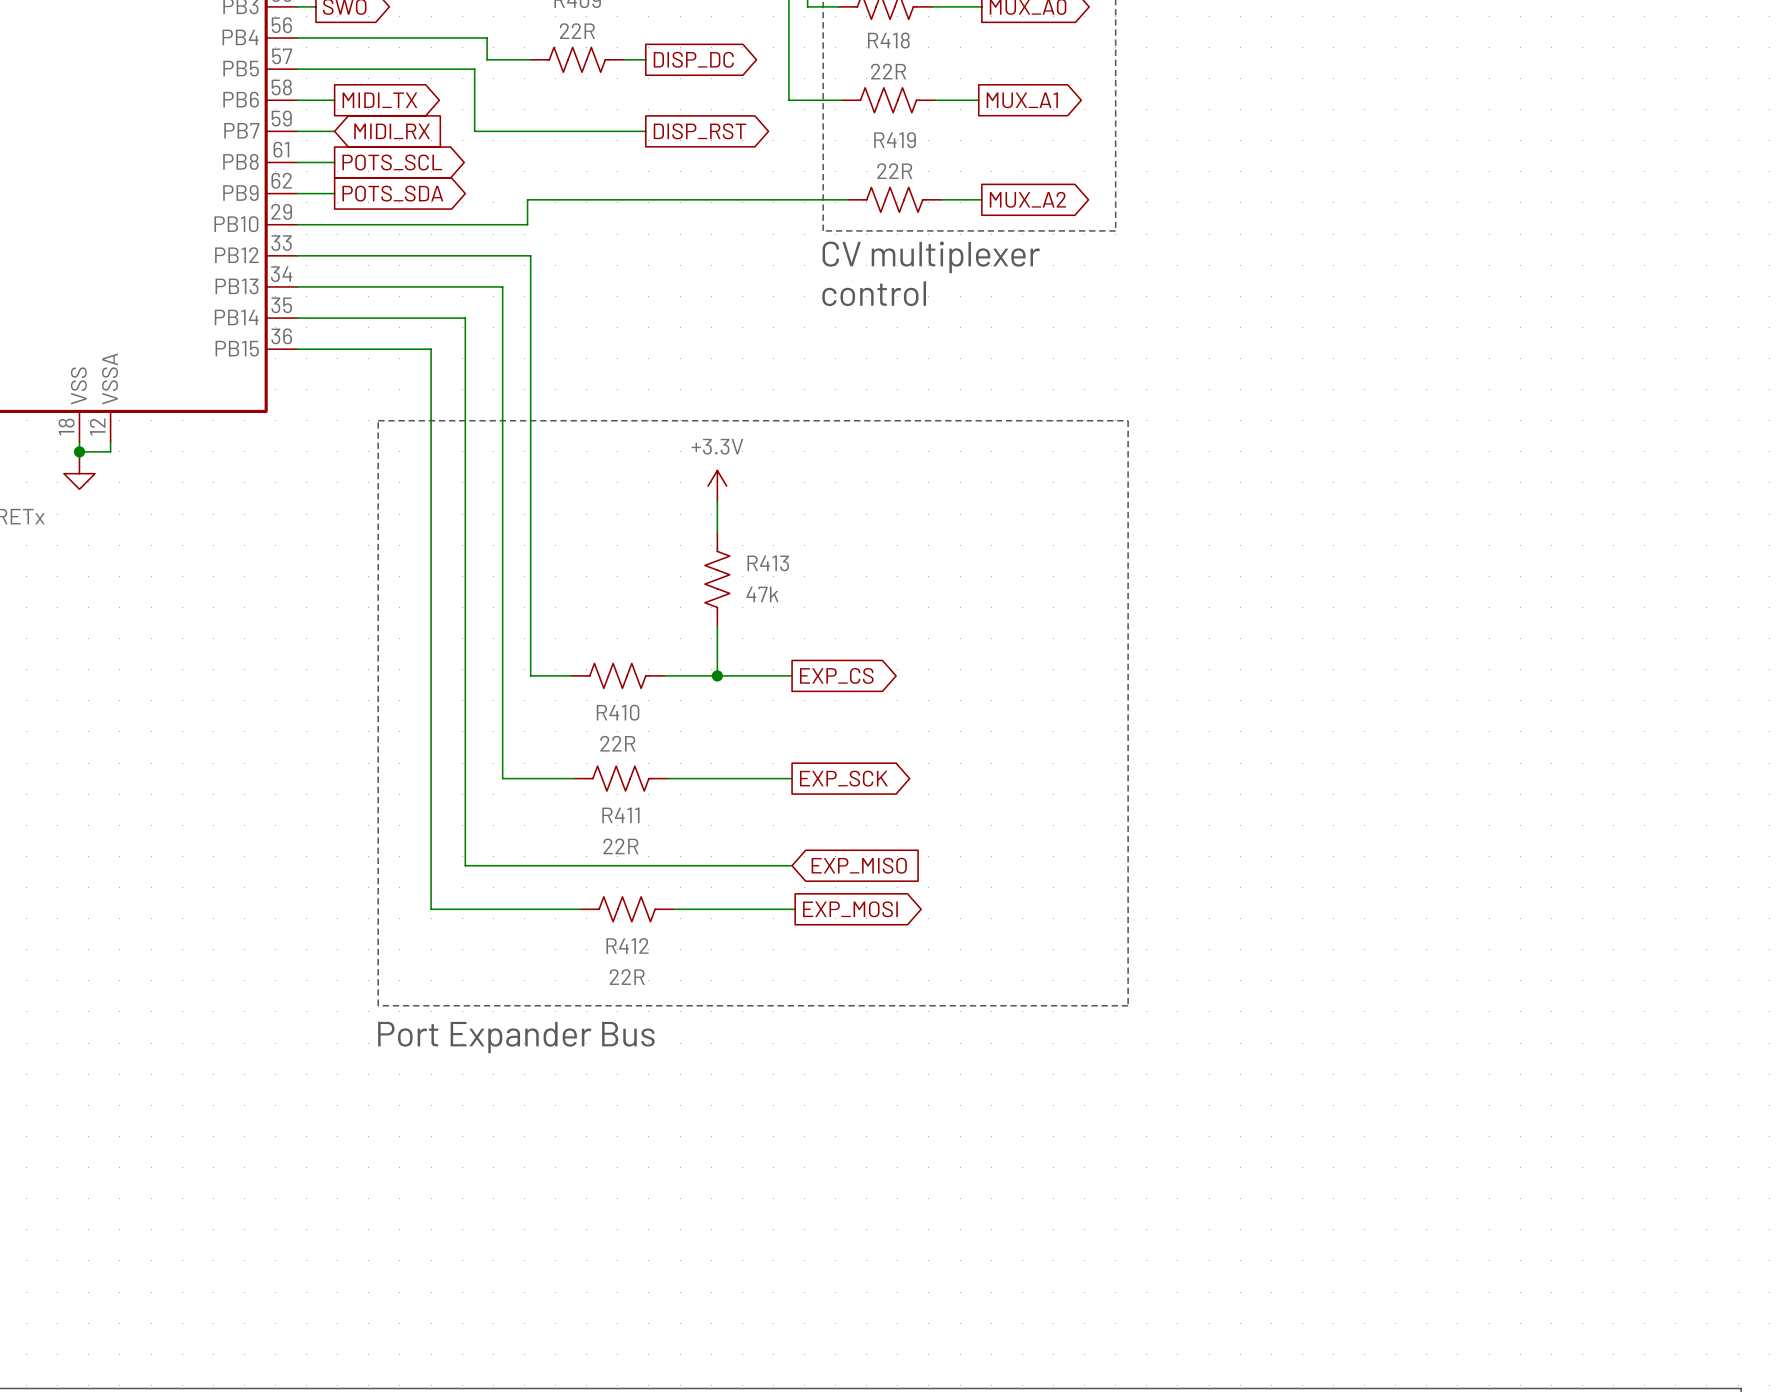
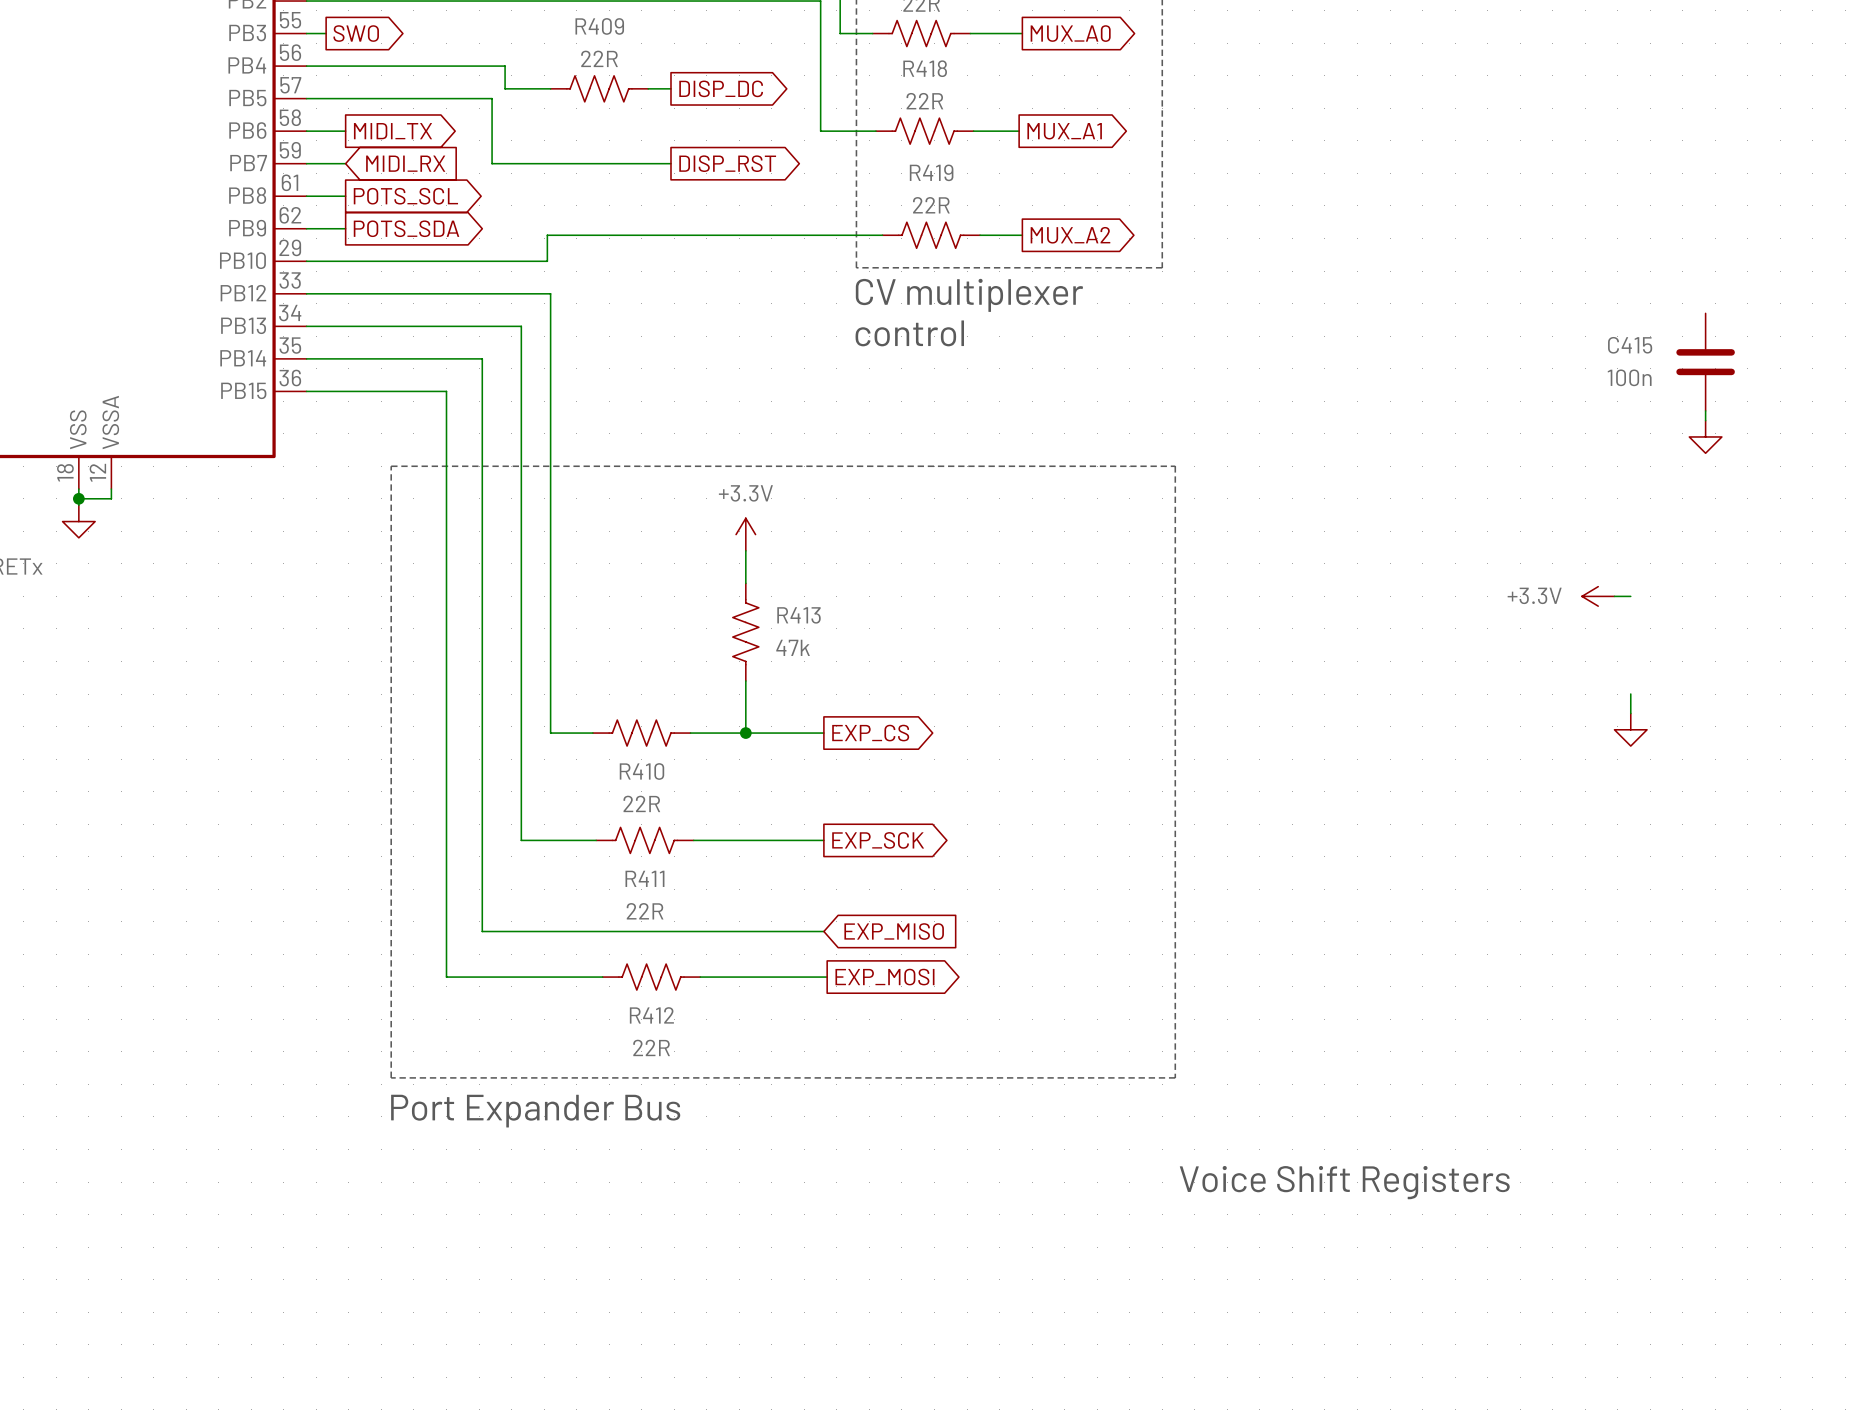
C415: none -> 100n (1705, 362)
wire: none -> (1705, 410) (1705, 420)
power symbol: none -> (1705, 436)
power symbol: none -> +3.3V (1598, 596)
wire: none -> (1614, 596) (1630, 596)
wire: none -> (1630, 694) (1630, 713)
power symbol: none -> (1630, 729)
text: none -> Voice Shift Registers (1344, 1182)

